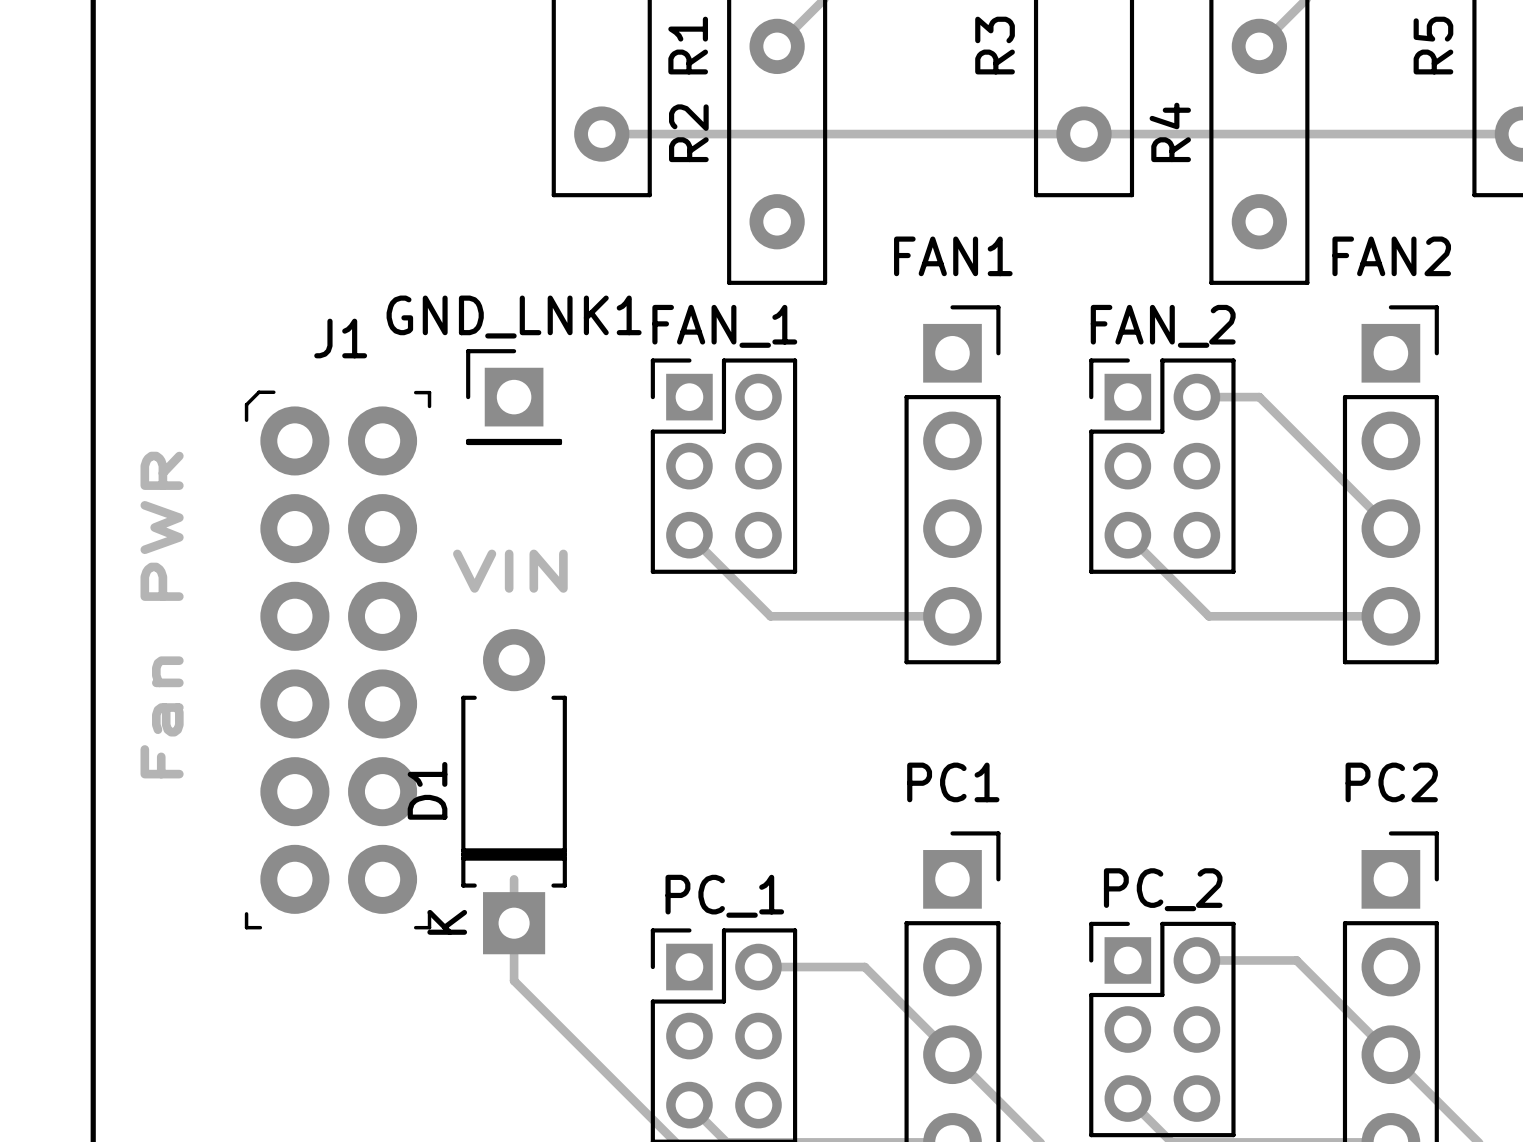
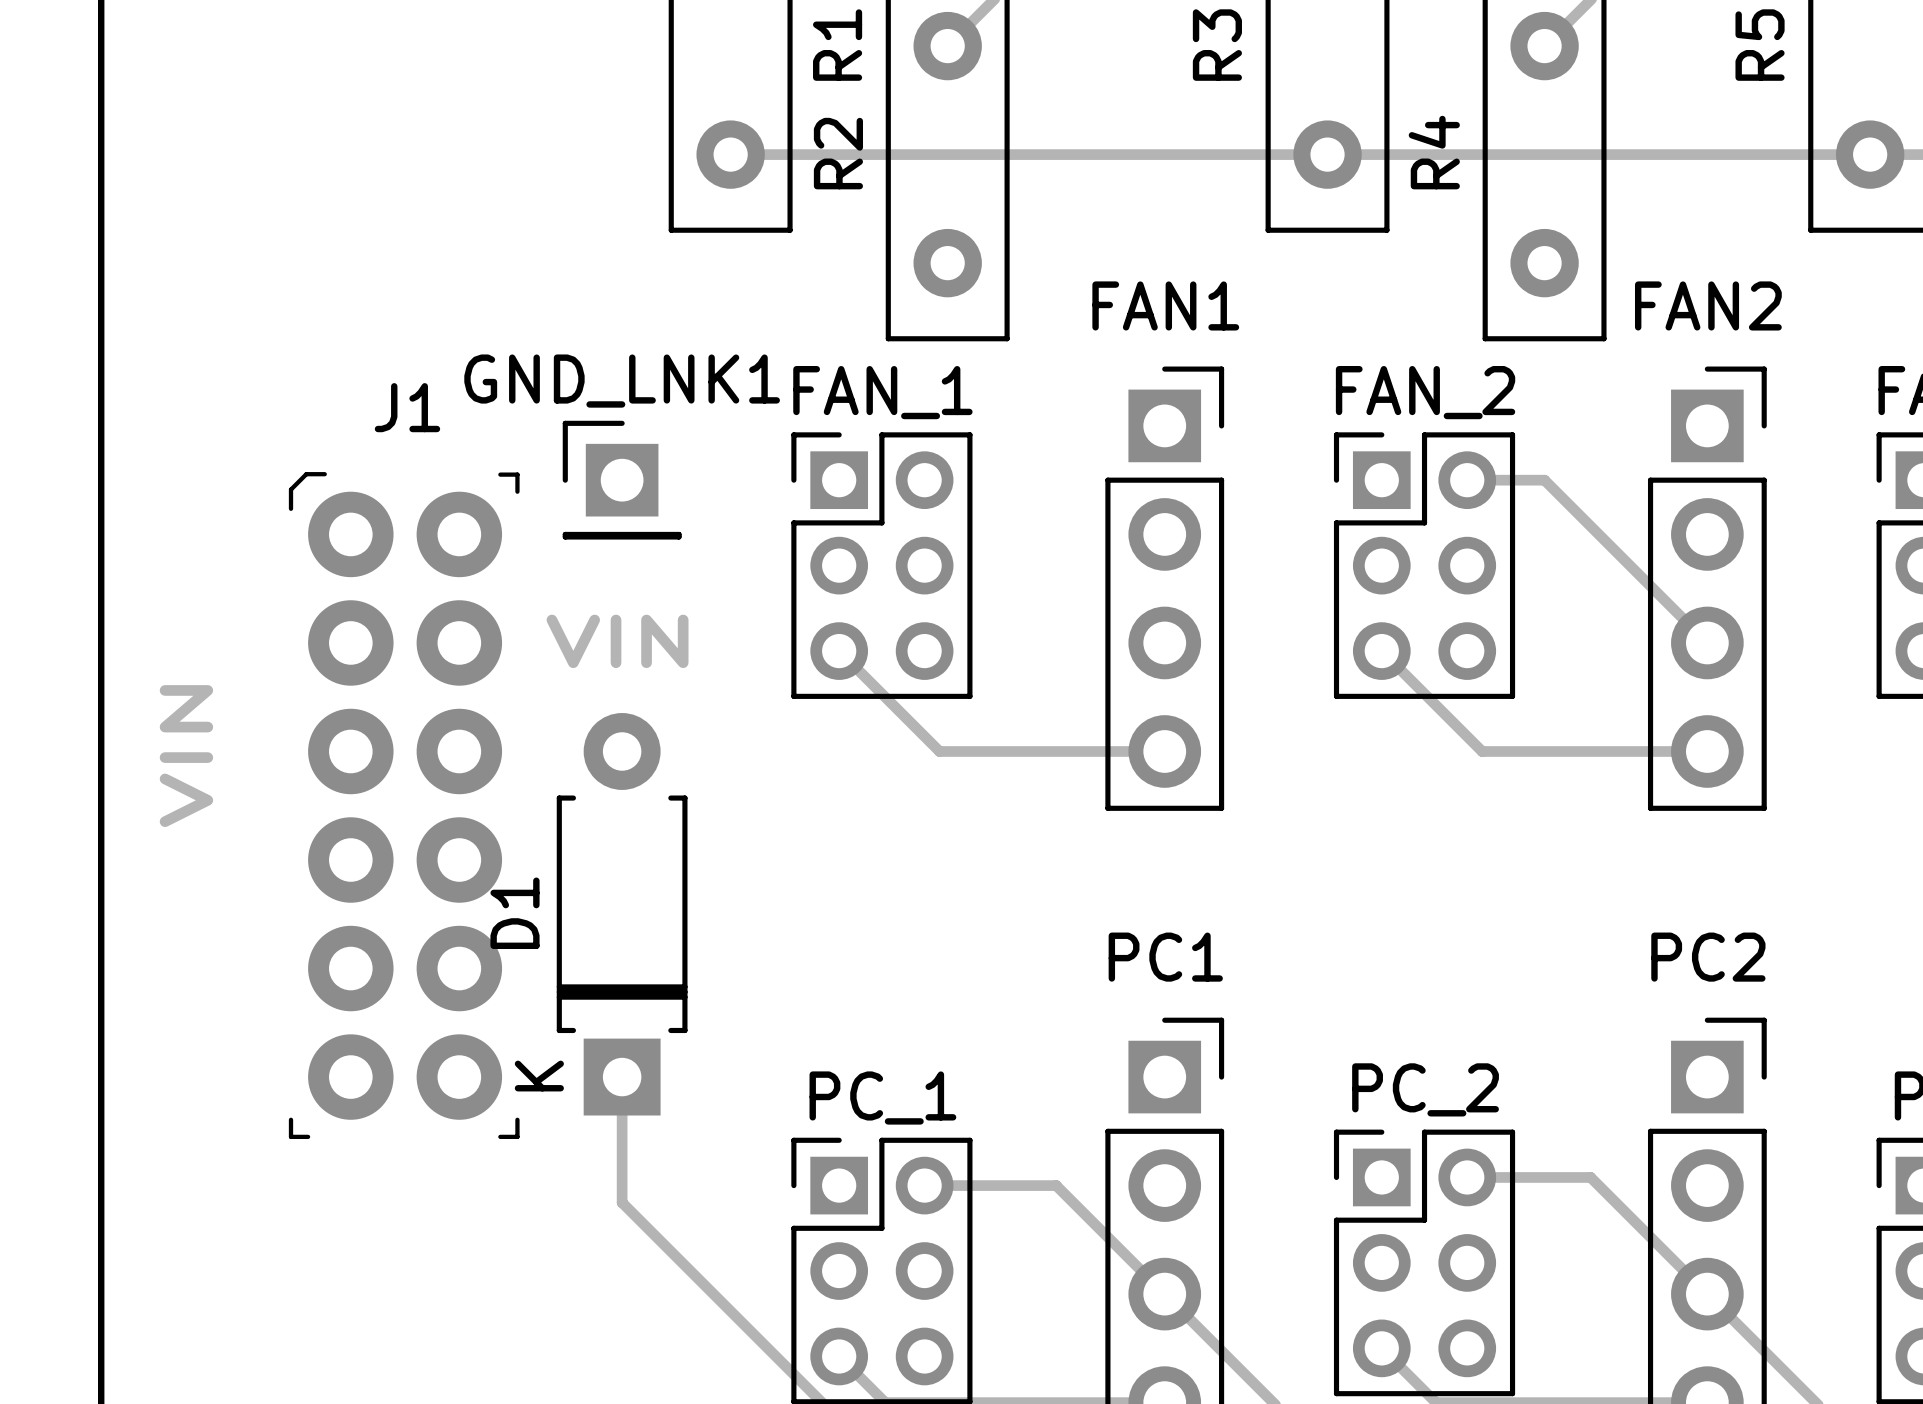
text position: VIN (510, 571) -> VIN (617, 641)
text: Fan PWR (162, 615) -> VIN (186, 756)
D1 position: (514, 791) -> (622, 914)

